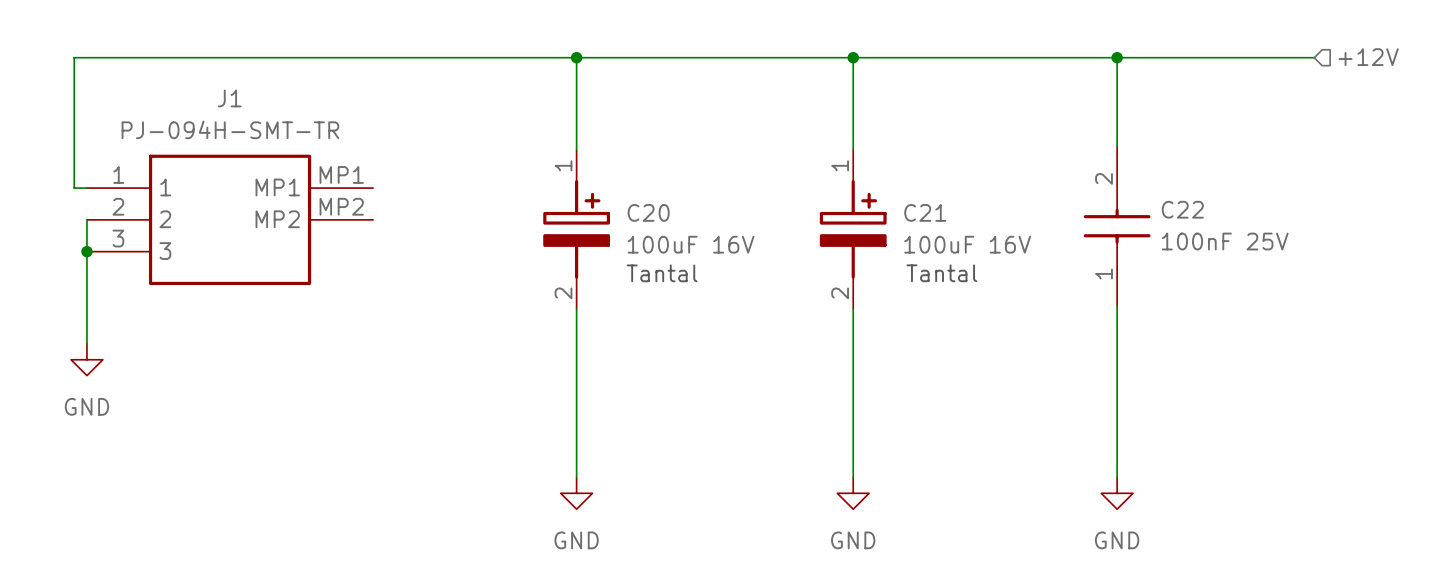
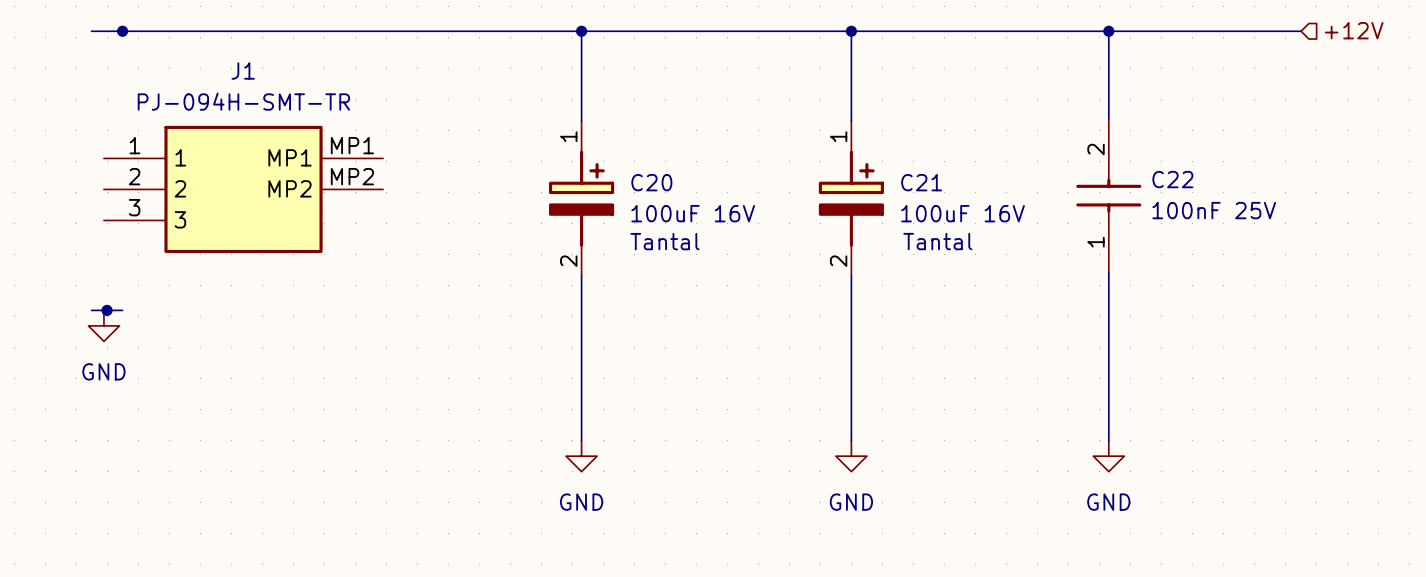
wire: (74, 57) (74, 188) (86, 188) -> none
junction: none -> (122, 31)
wire: (86, 219) (86, 343) -> none
junction: (86, 251) -> none
wire: none -> (91, 310) (122, 310)
junction: none -> (107, 310)

